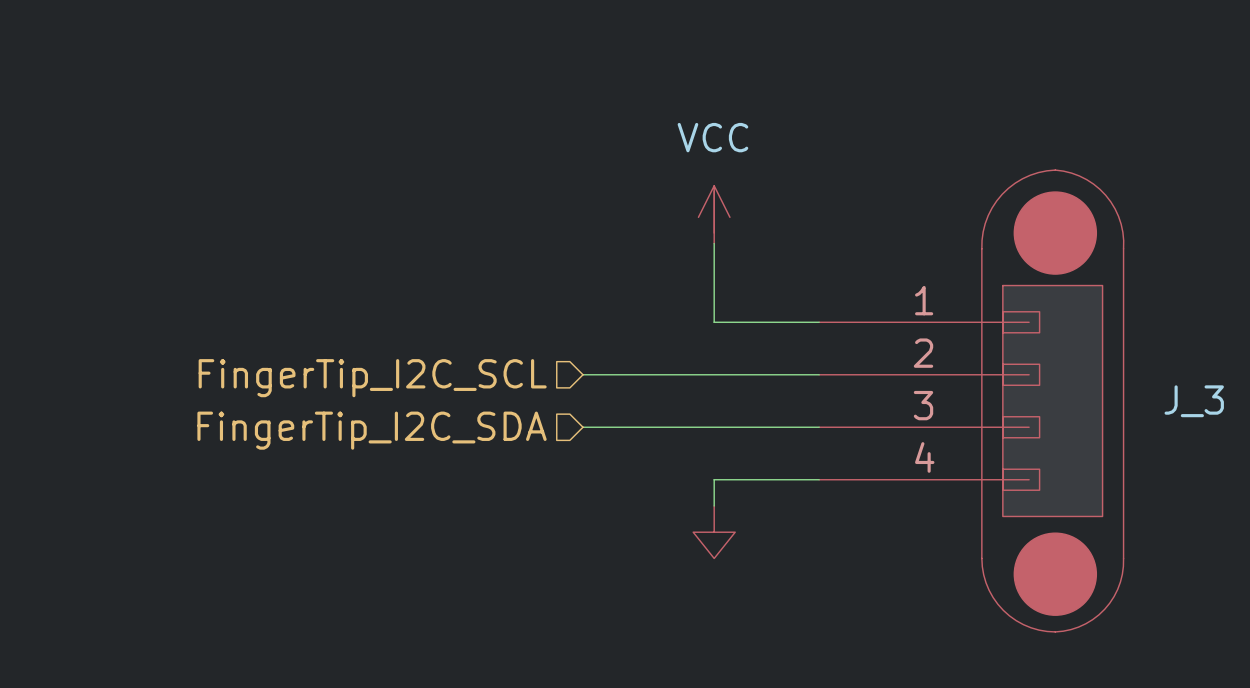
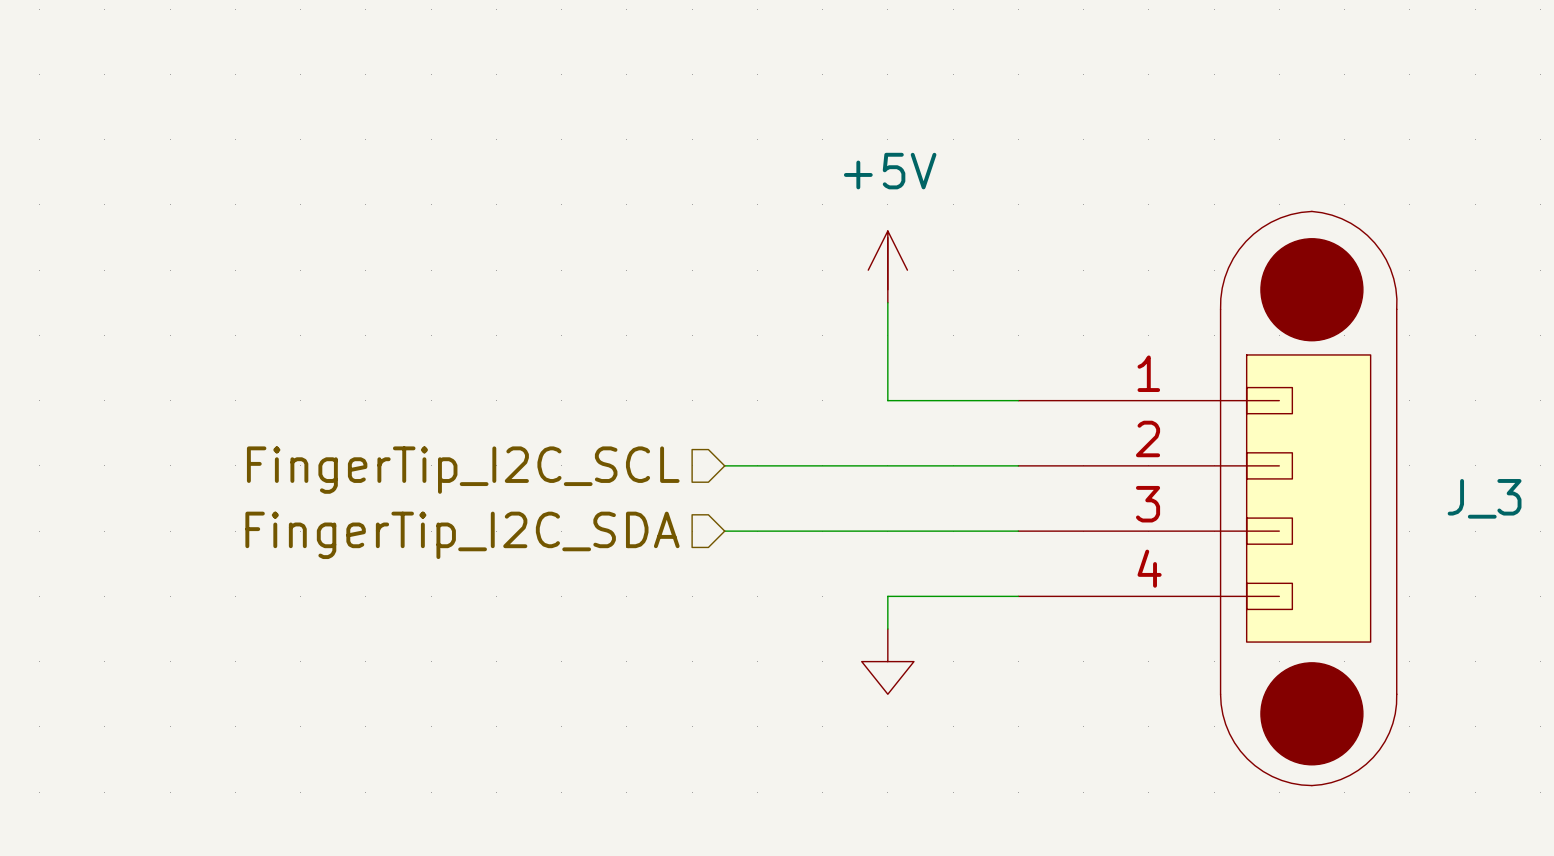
power symbol: VCC (714, 214) -> +5V (887, 266)

